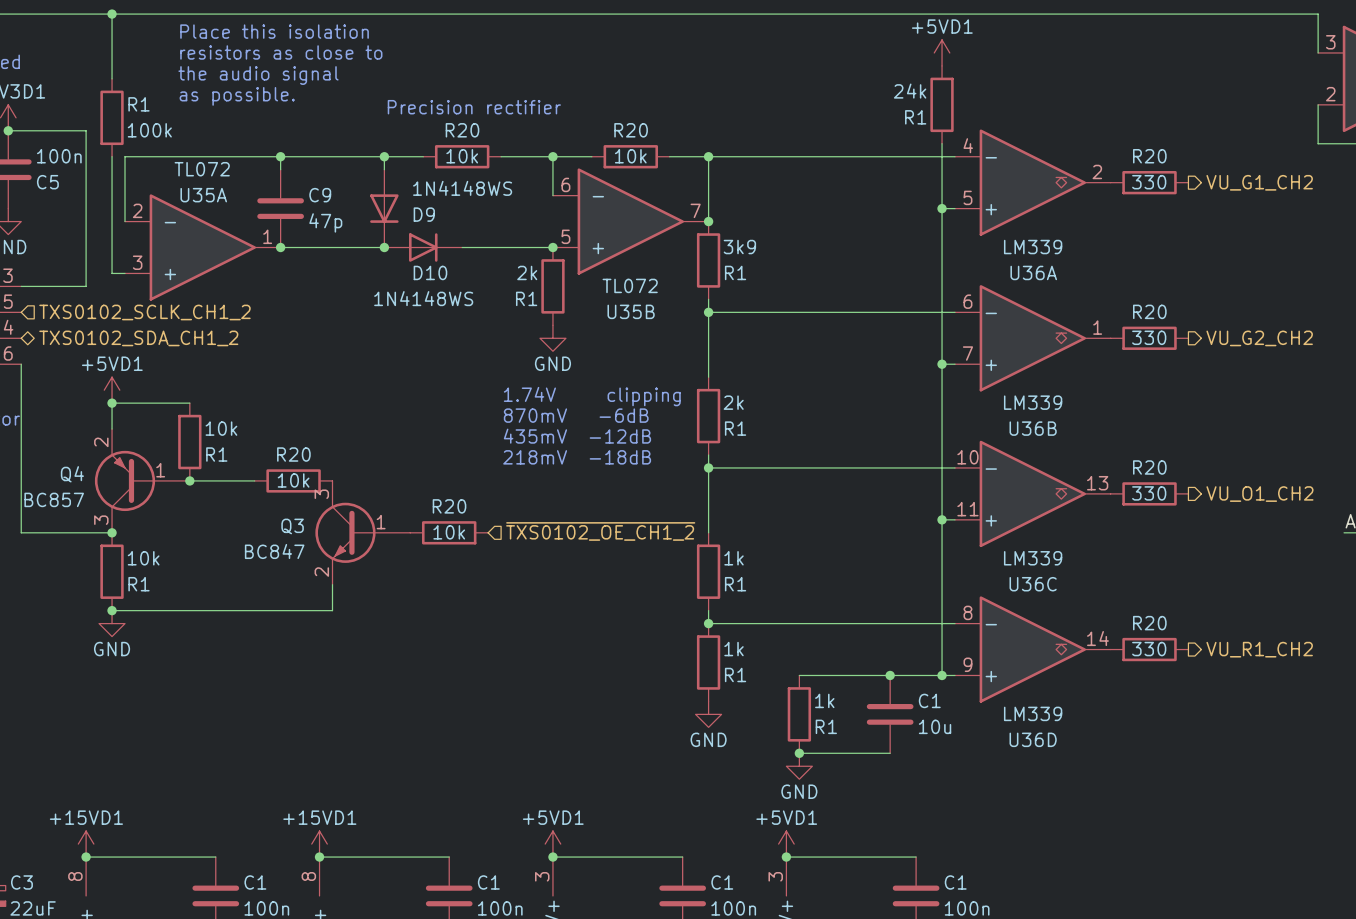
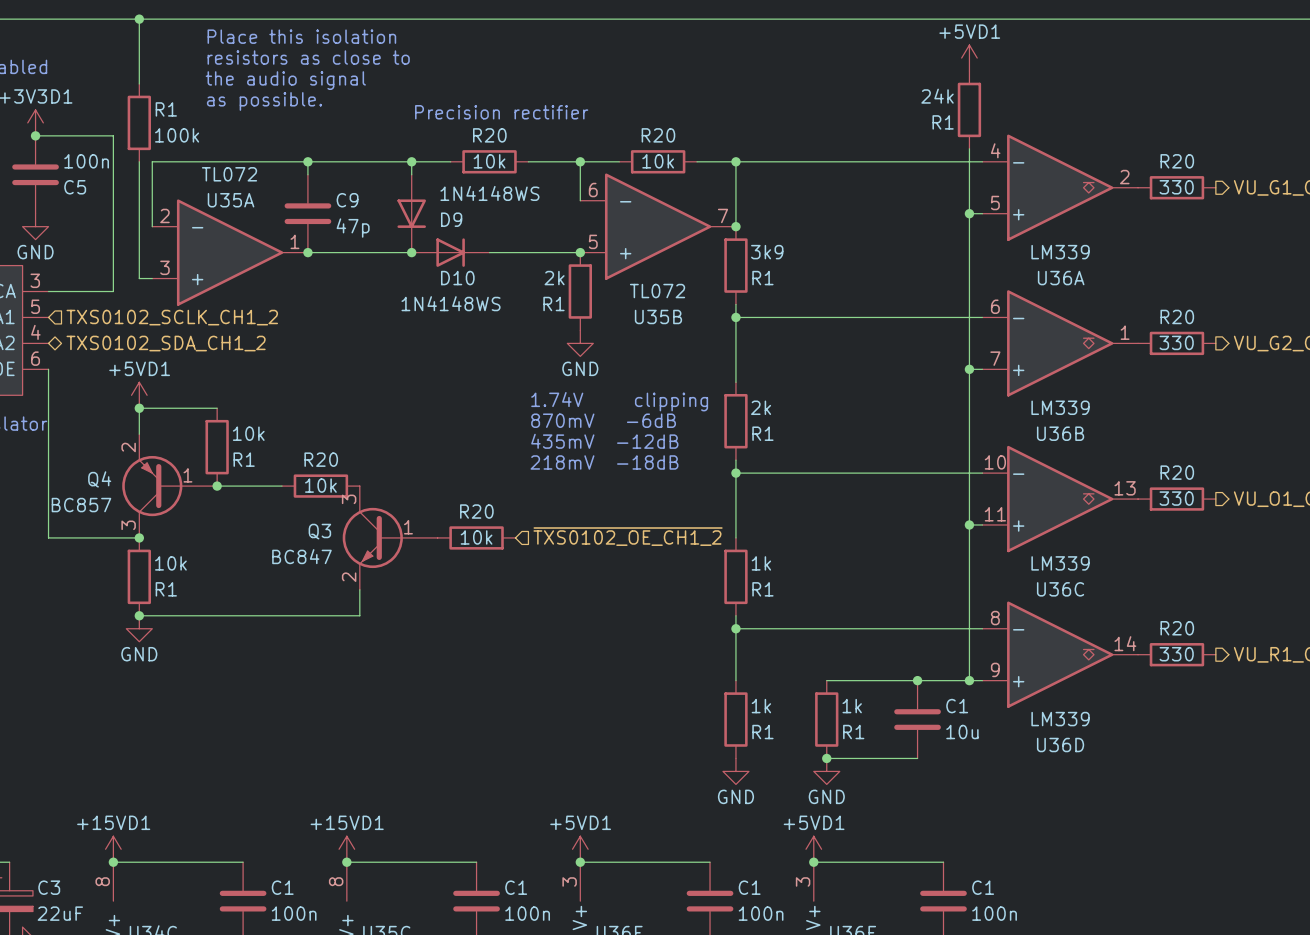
wire: none -> (735, 628) (735, 680)
R1 position: (708, 662) -> (735, 719)
power symbol position: GND (708, 714) -> GND (735, 771)

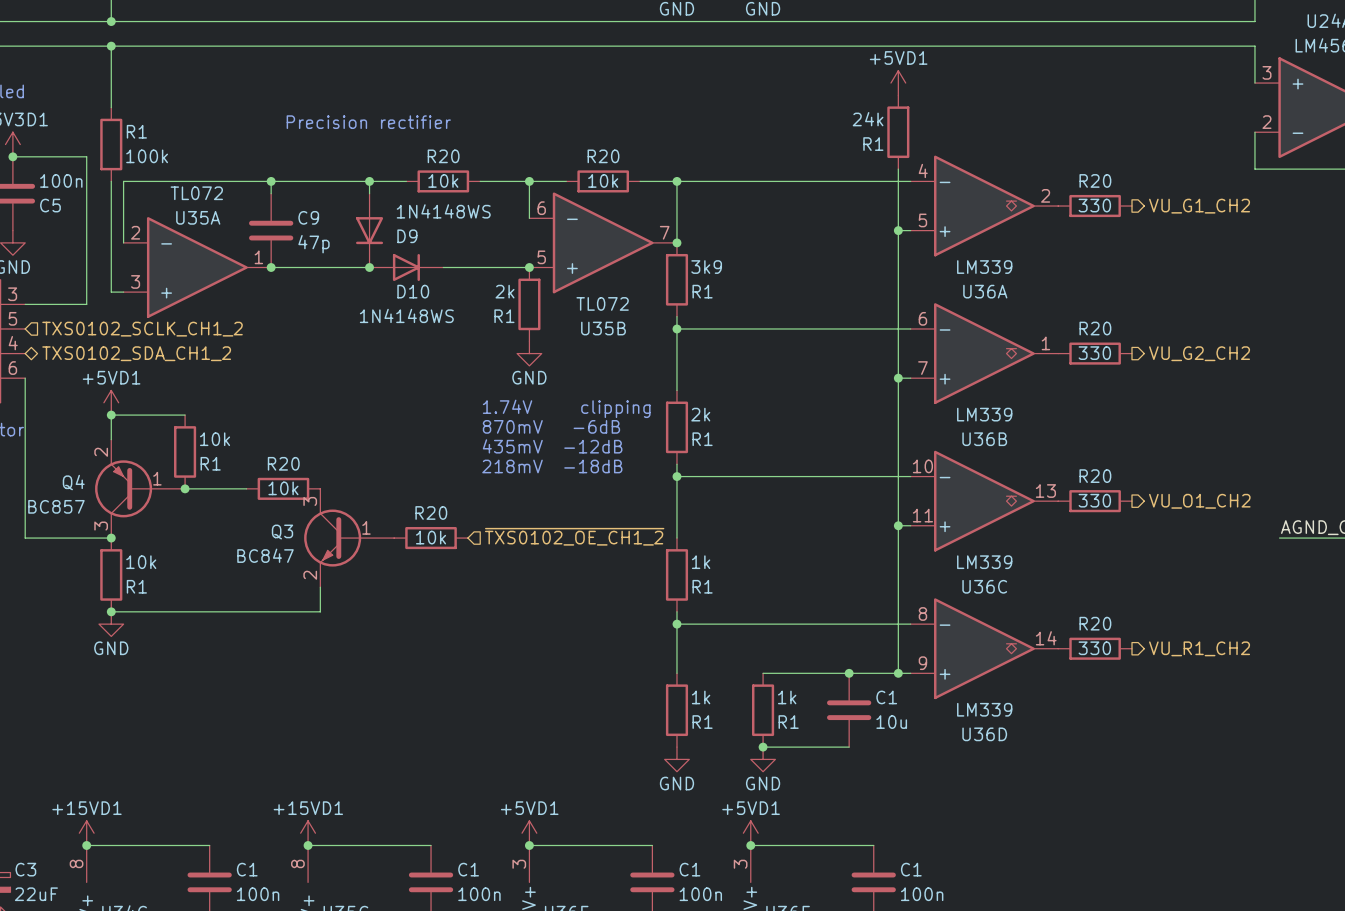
text: Place this isolation (301, 36) -> none
text: resistors as close to (308, 57) -> none
text: the audio signal (285, 80) -> none
text: as possible. (264, 101) -> none
text position: Precision rectifier (501, 112) -> Precision rectifier (368, 122)

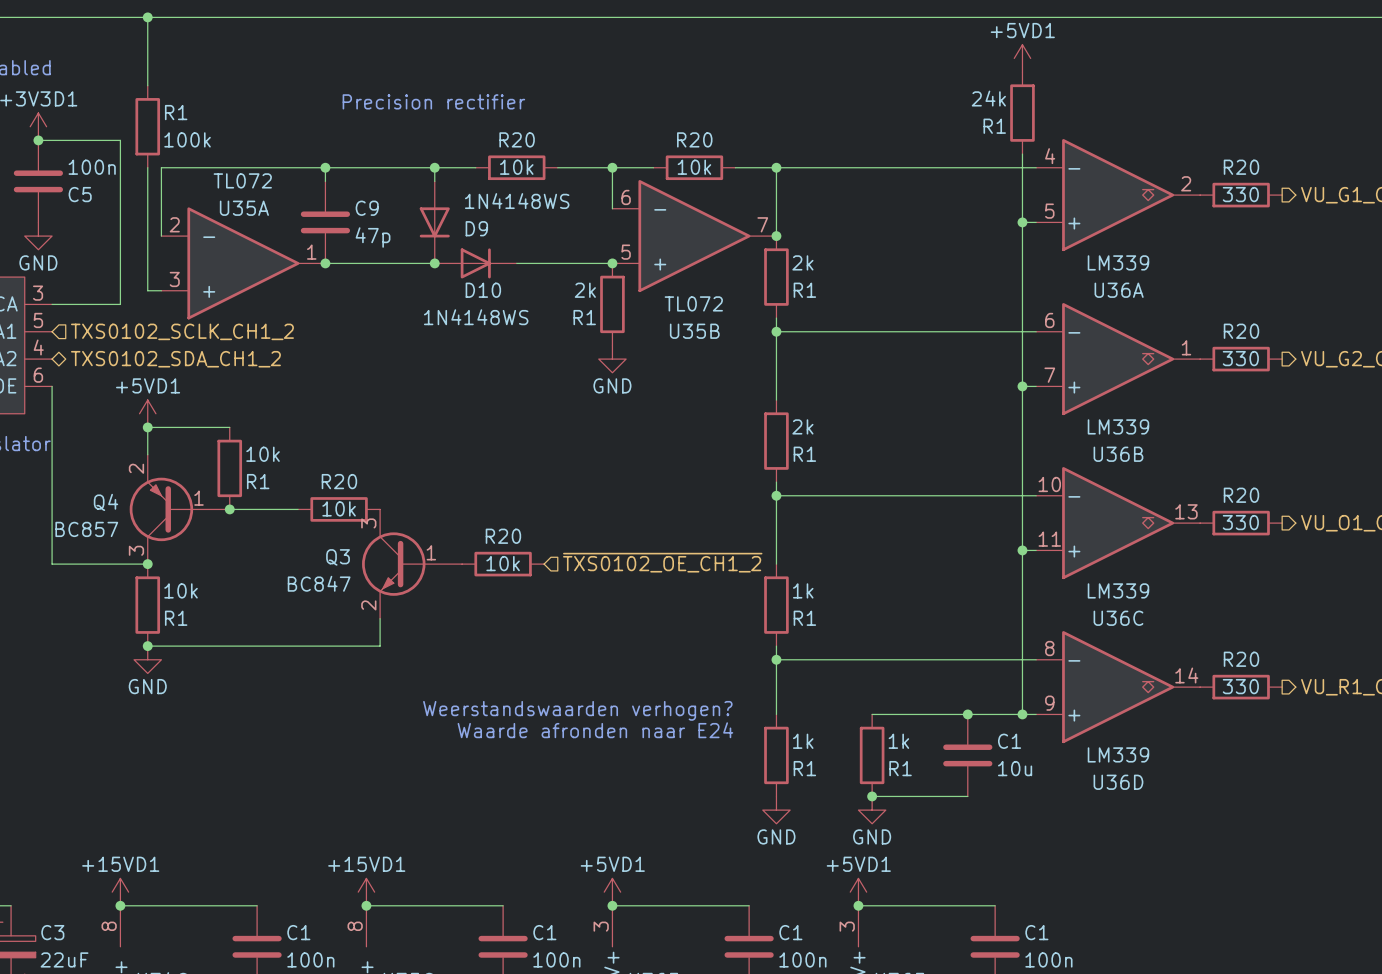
R1 value: 3k9 (706, 267) -> 2k (802, 262)
text: 1.74V clipping (566, 408) -> none
text: 870mV -6dB (551, 426) -> none
text: 435mV -12dB (552, 446) -> none
text: 218mV -18dB (552, 466) -> none
text: none -> Weerstandswaarden verhogen? (577, 710)
text: none -> Waarde afronden naar E24 (595, 730)

